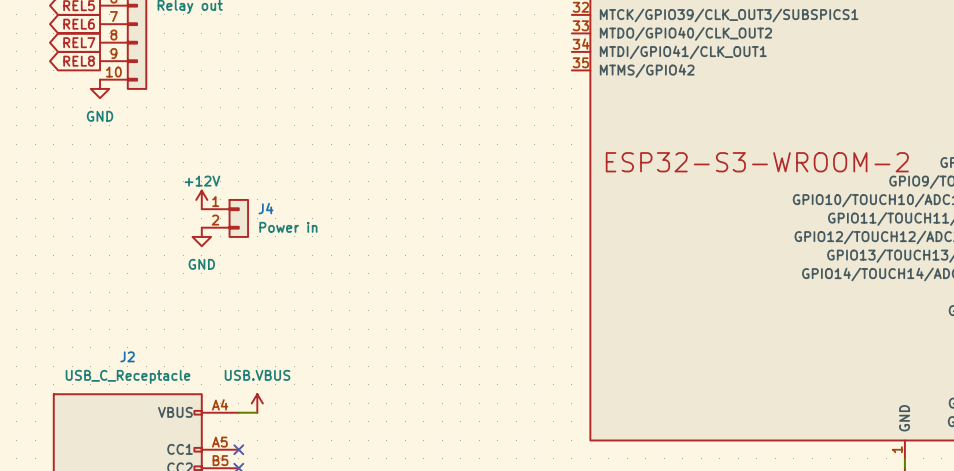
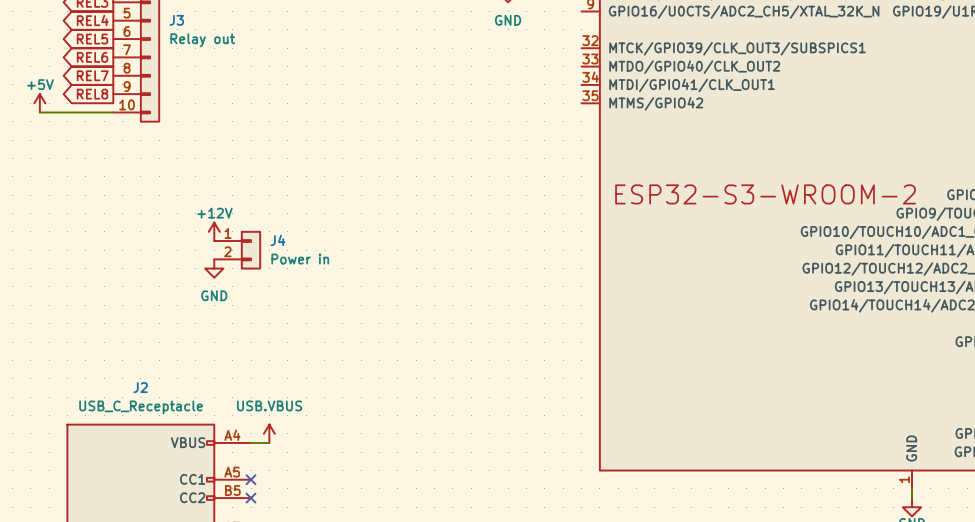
power symbol: none -> +5V (39, 103)
wire: none -> (39, 112) (113, 112)
power symbol: GND (100, 88) -> none

